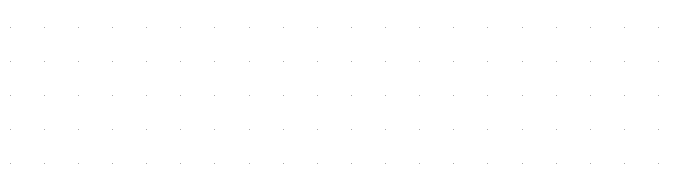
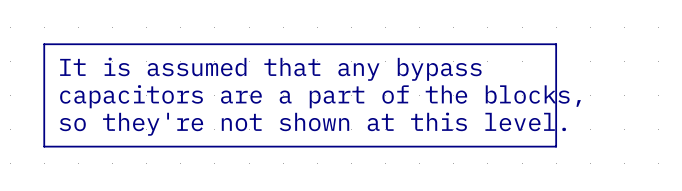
line: none -> (44, 44) (556, 44) (556, 146) (44, 146) (44, 44)
text: none -> It is assumed that any bypass (270, 69)
text: none -> capacitors are a part of the blocks, (320, 96)
text: none -> so they're not shown at this level. (312, 124)

